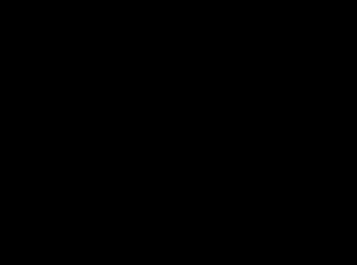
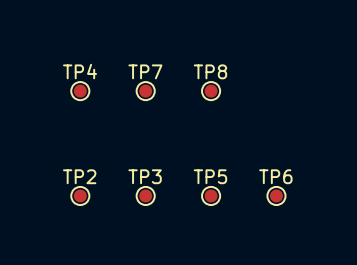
TP4: none -> (80, 91)
TP7: none -> (145, 91)
TP8: none -> (211, 91)
TP2: none -> (80, 195)
TP3: none -> (145, 195)
TP5: none -> (211, 195)
TP6: none -> (276, 195)

